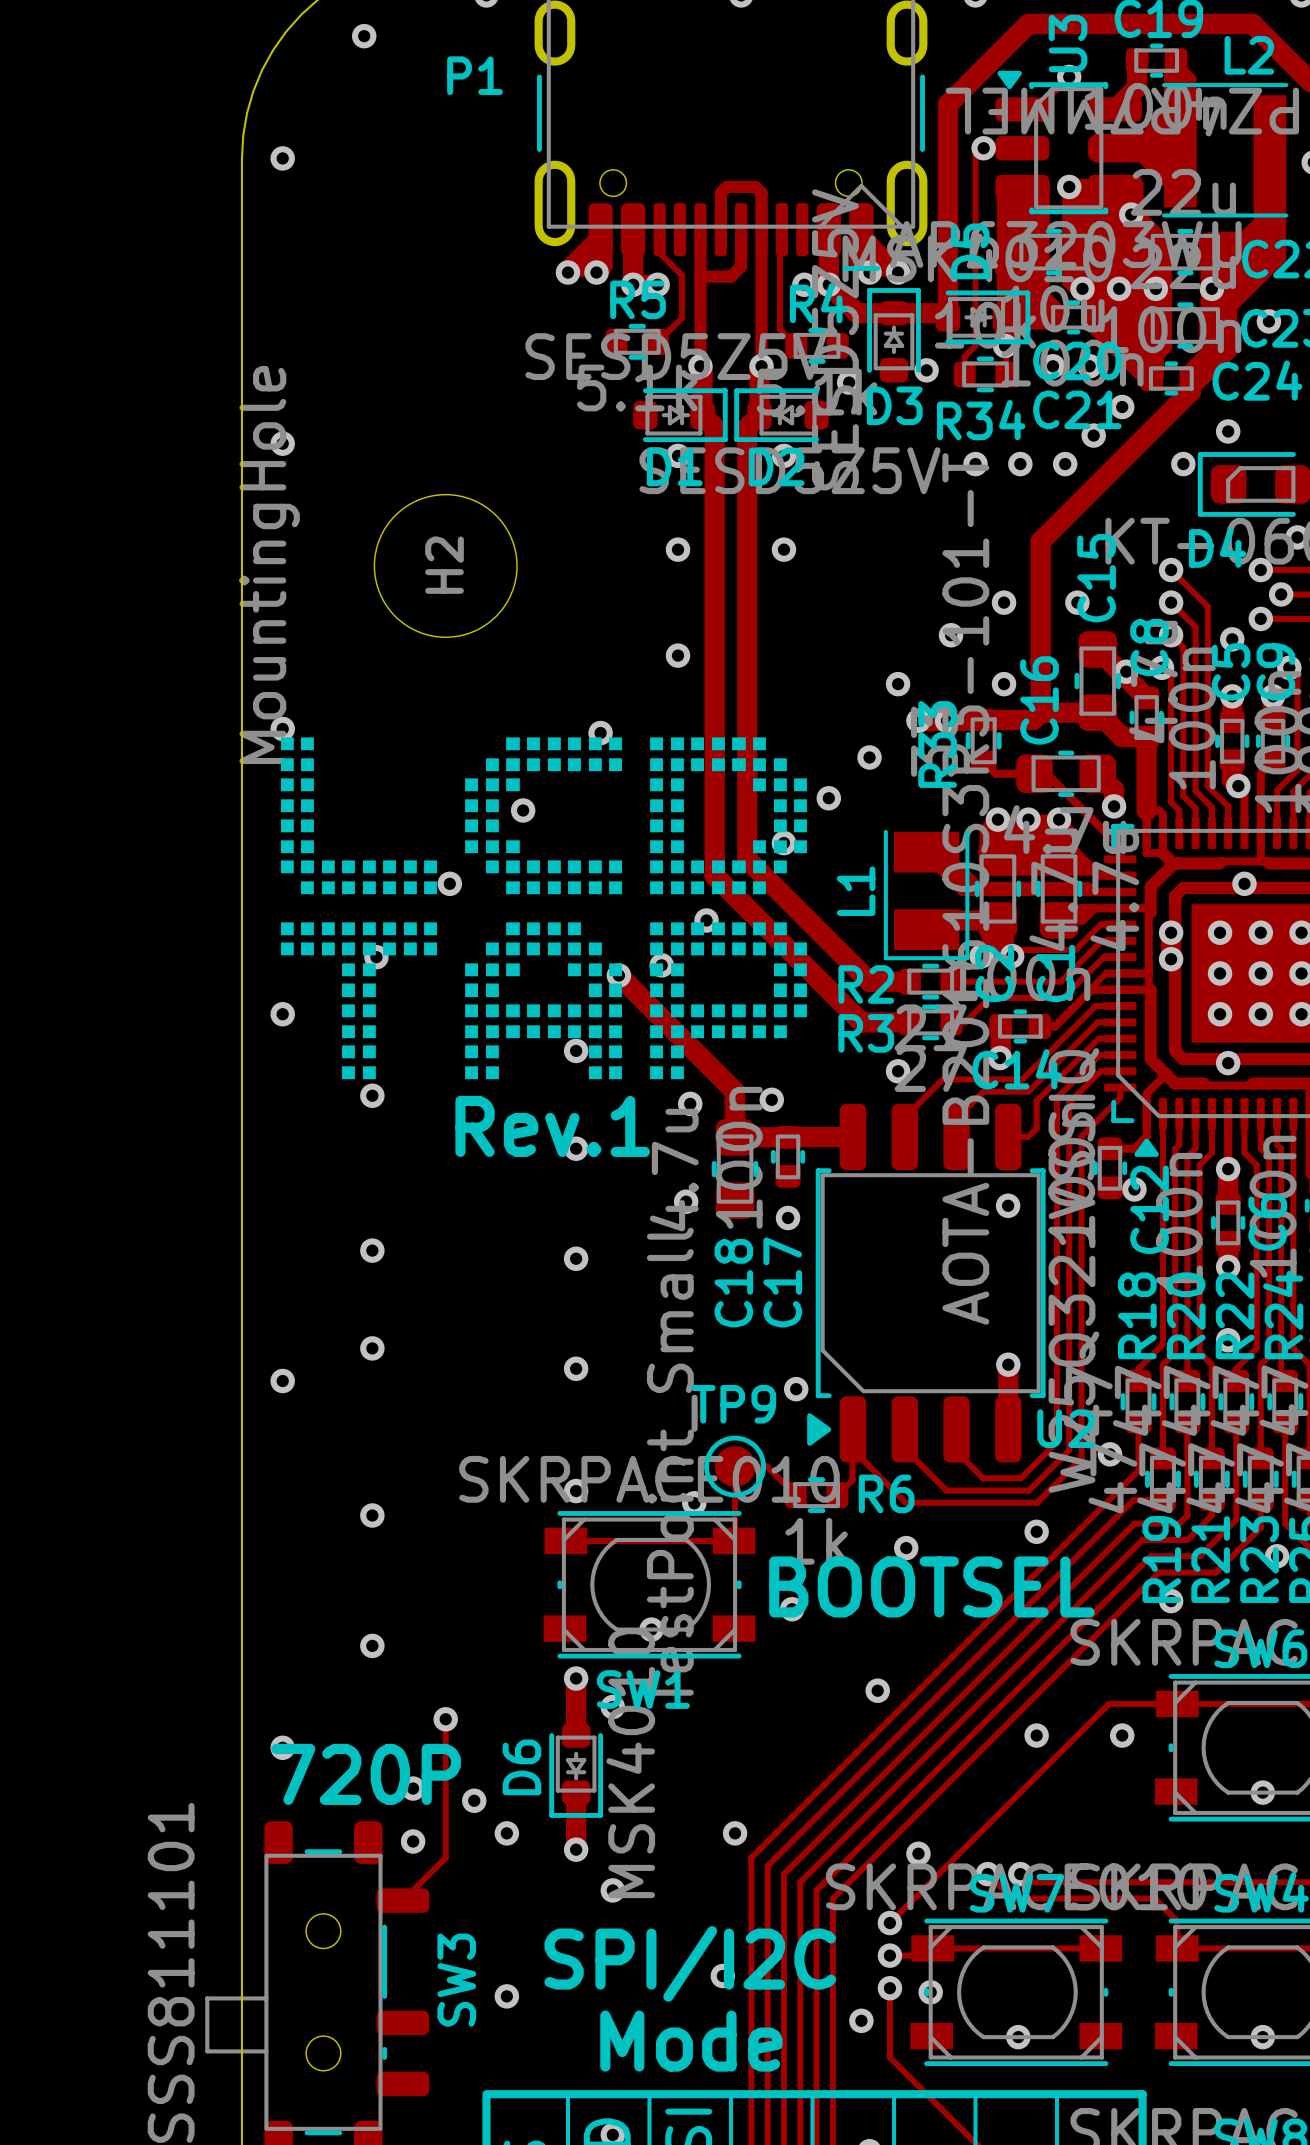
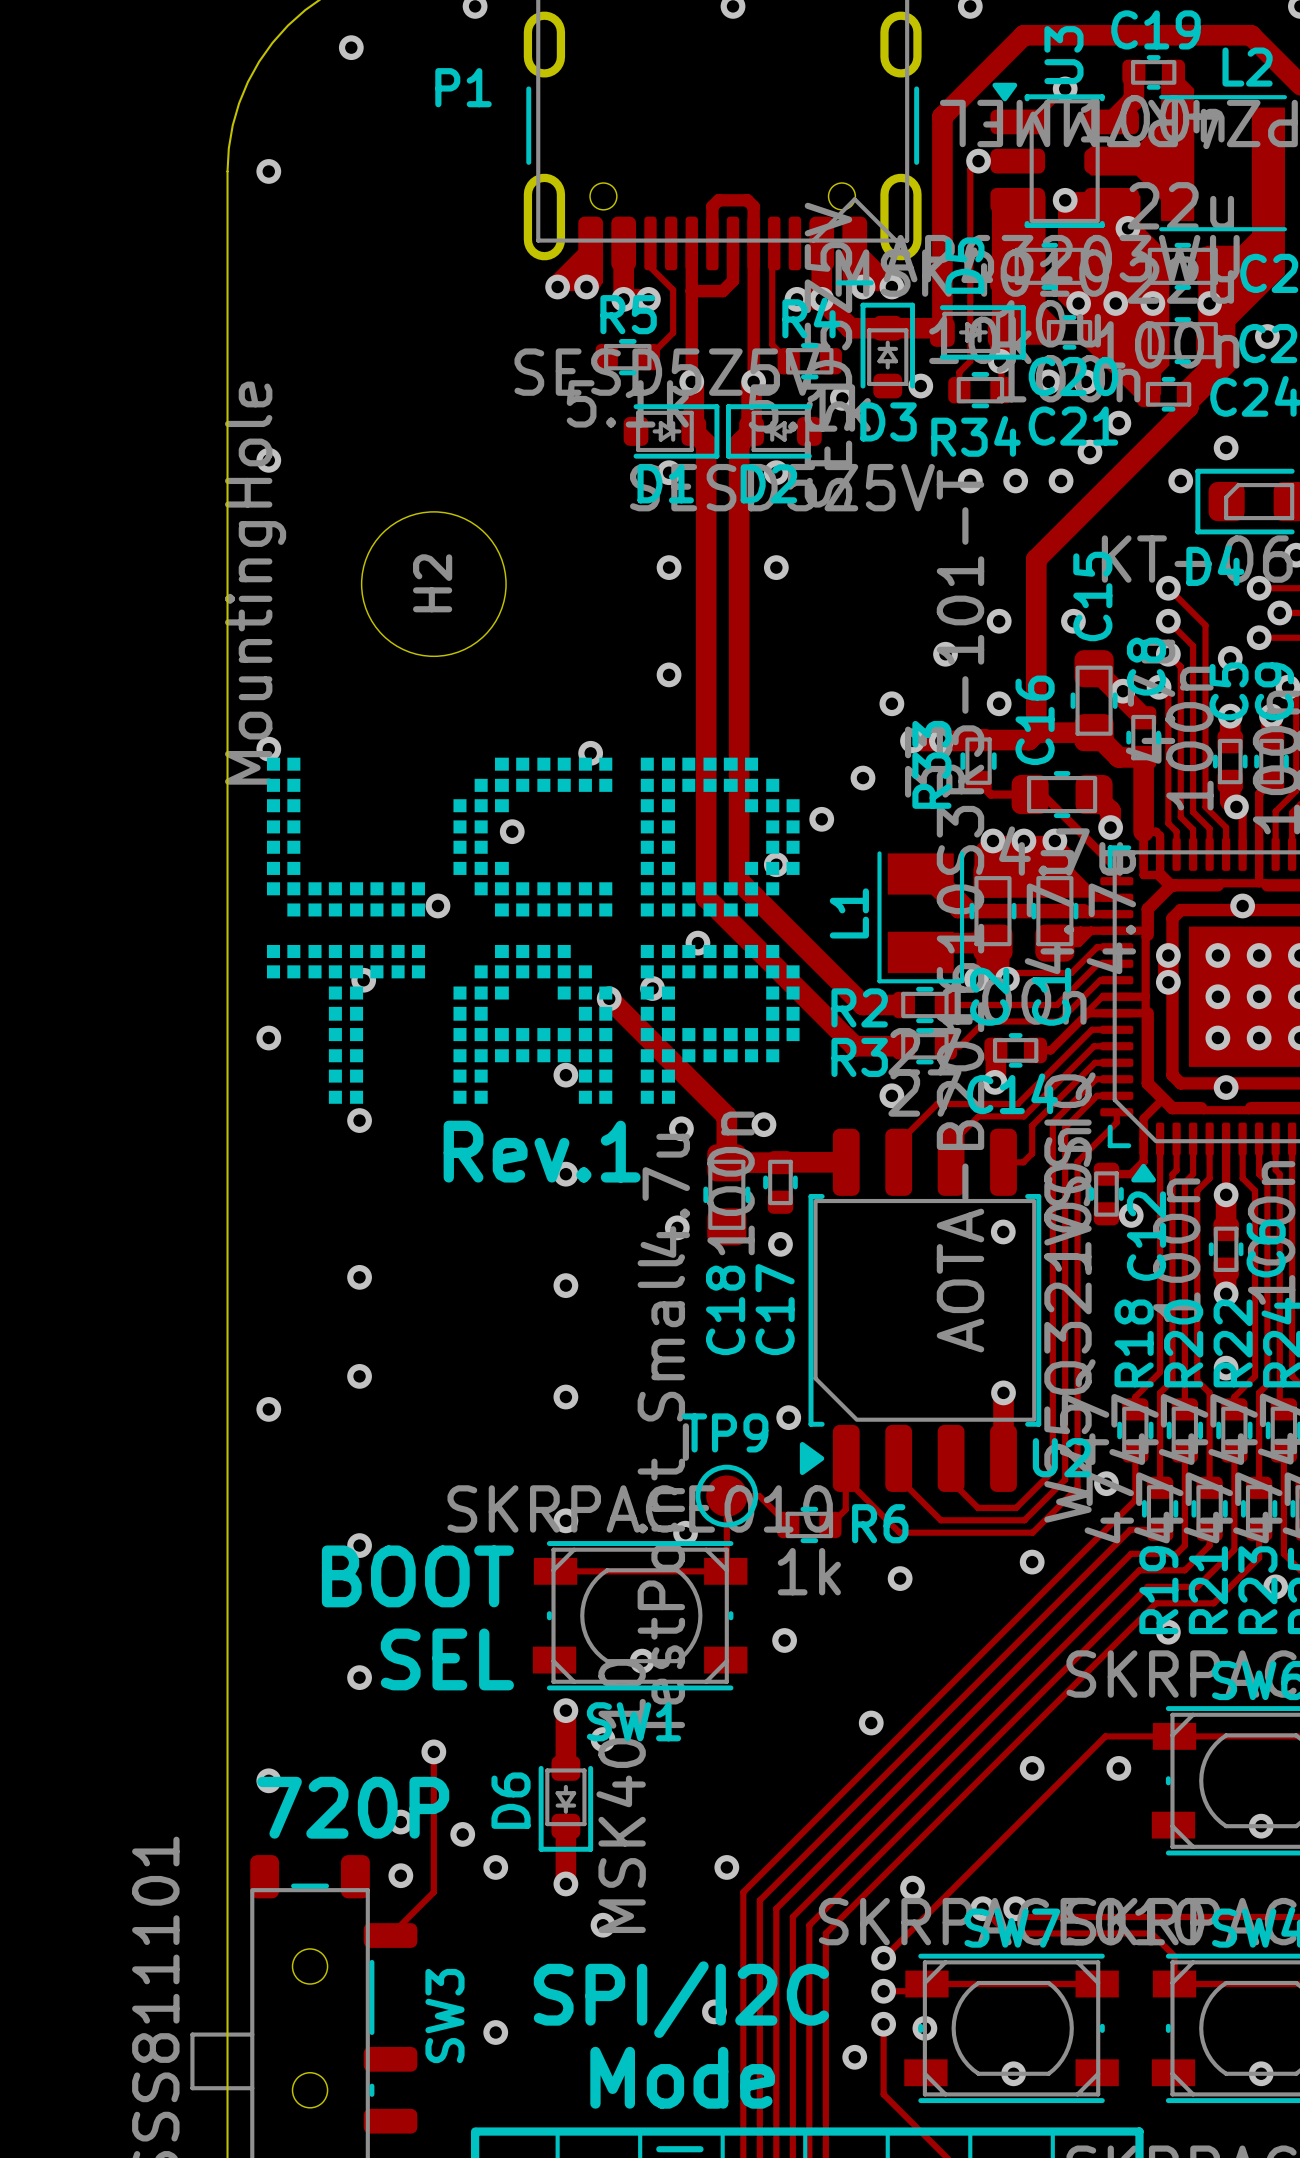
text: none -> BOOT (417, 1576)
text: BOOTSEL (931, 1586) -> none
text: none -> SEL (447, 1659)

